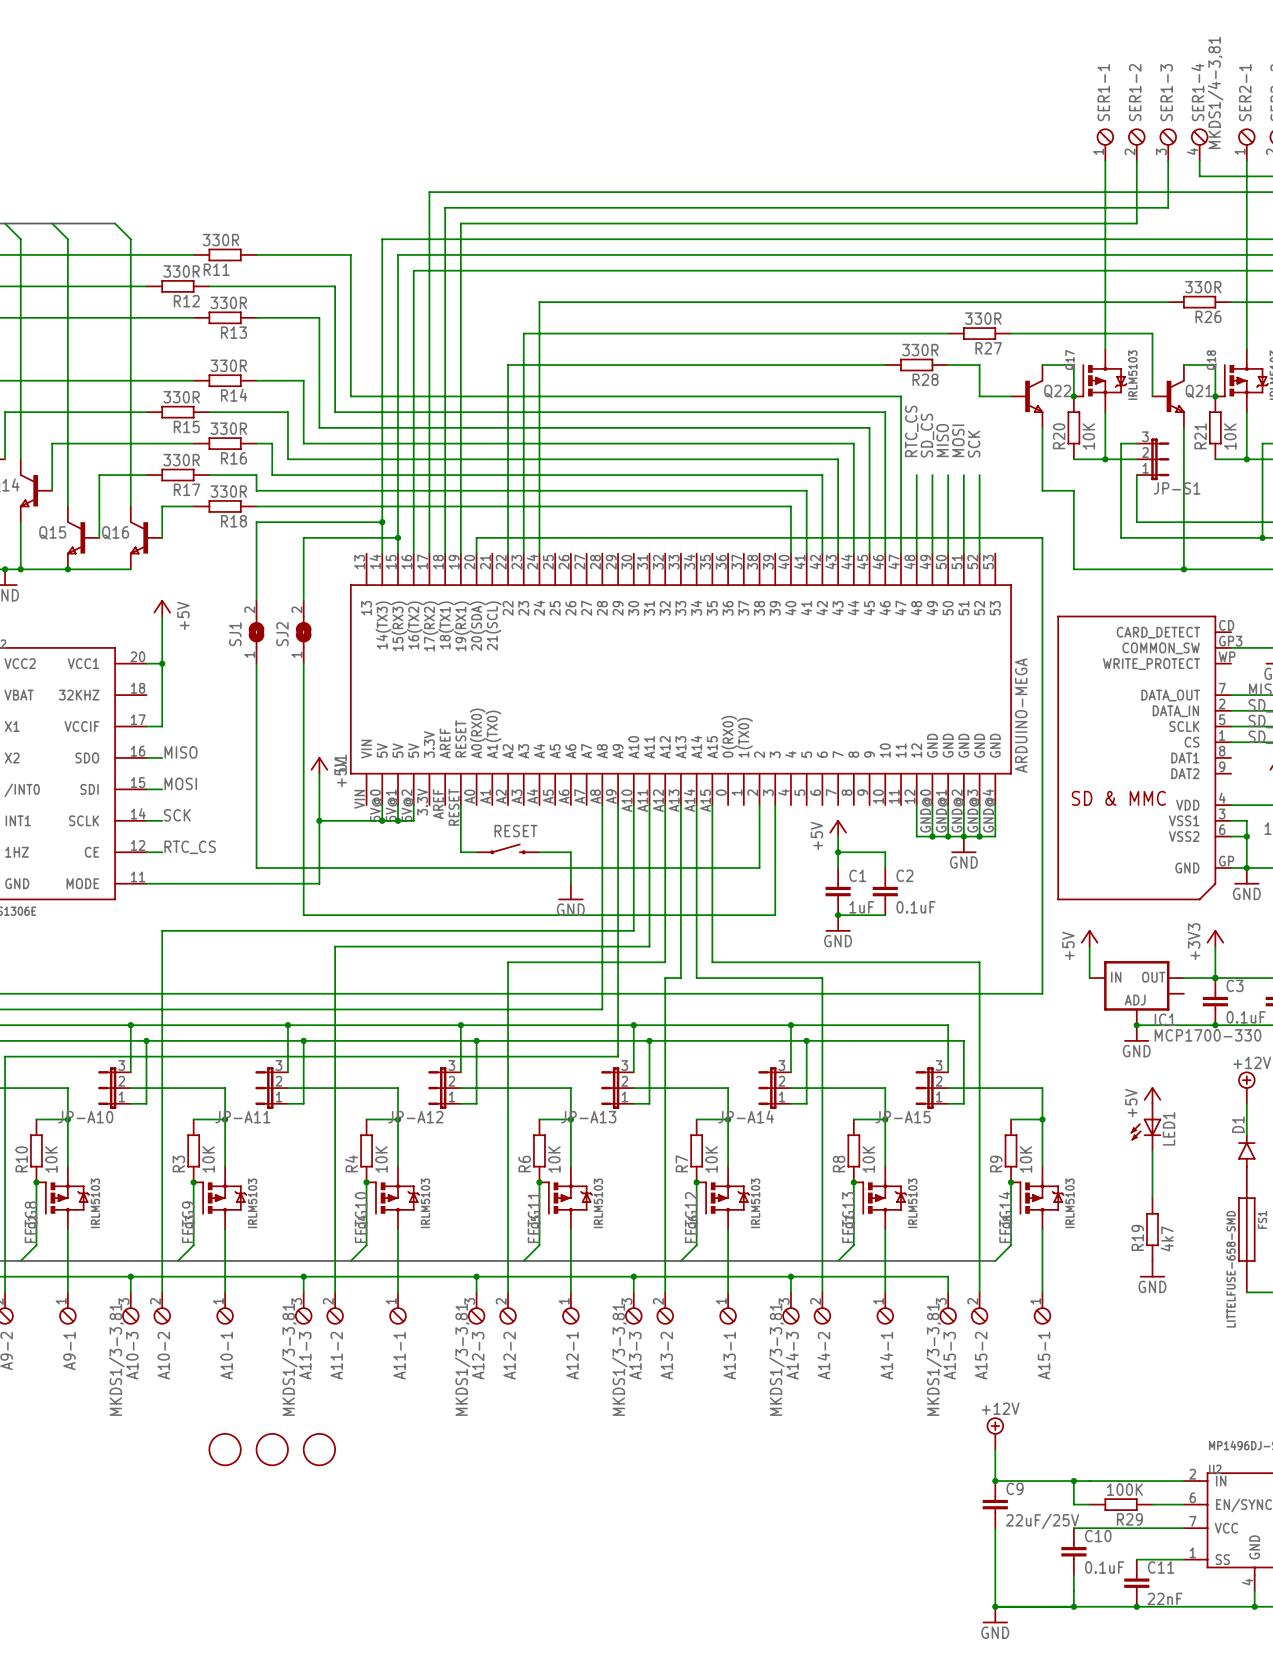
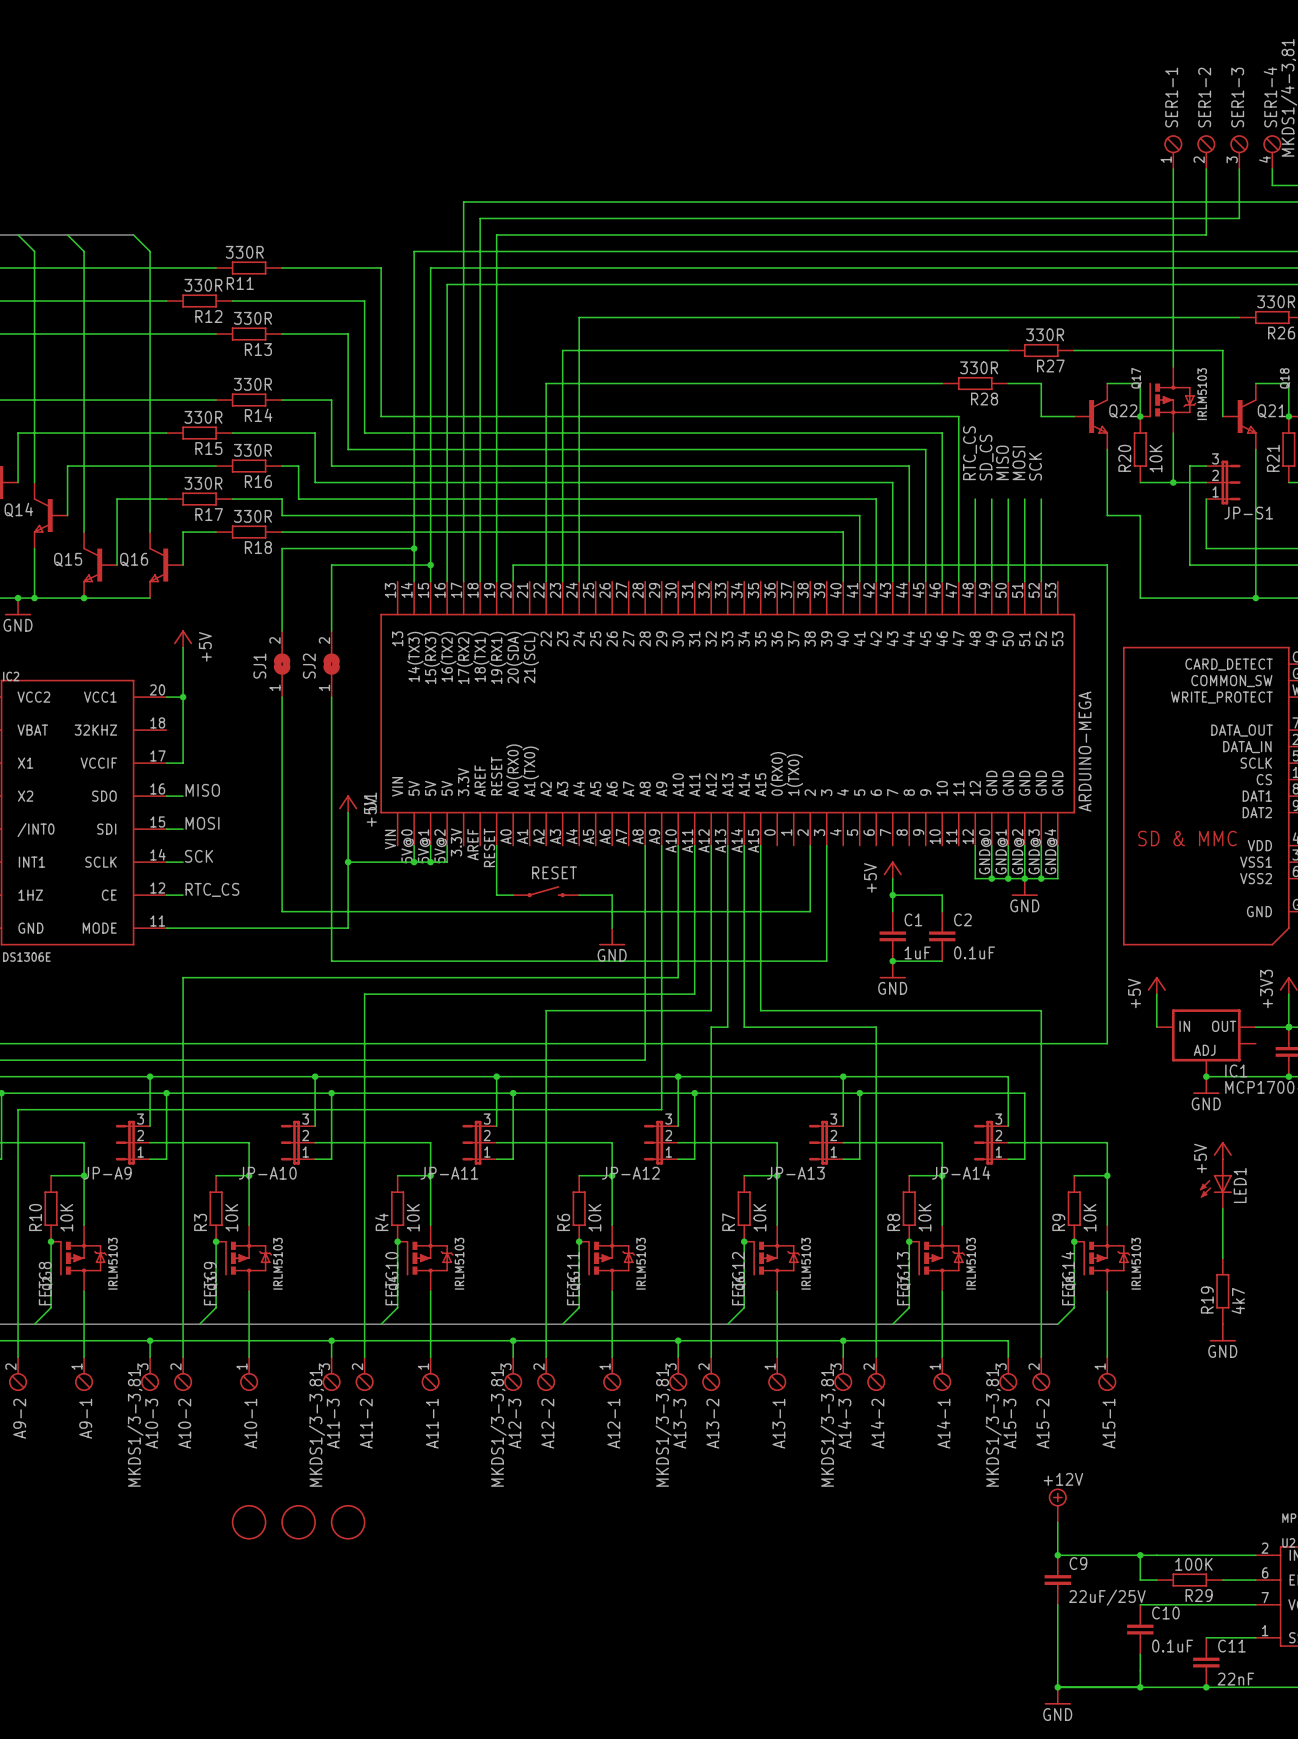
JP-A14 name: JP-A14 (746, 1116) -> JP-A13 (795, 1173)
JP-A10 name: JP-A10 (85, 1117) -> JP-A9 (107, 1173)
JP-A11 name: JP-A11 (242, 1117) -> JP-A10 (267, 1173)
JP-A12 name: JP-A12 (415, 1117) -> JP-A11 (449, 1173)
JP-A13 name: JP-A13 (588, 1117) -> JP-A12 (630, 1173)
JP-A15 name: JP-A15 (903, 1117) -> JP-A14 (961, 1172)

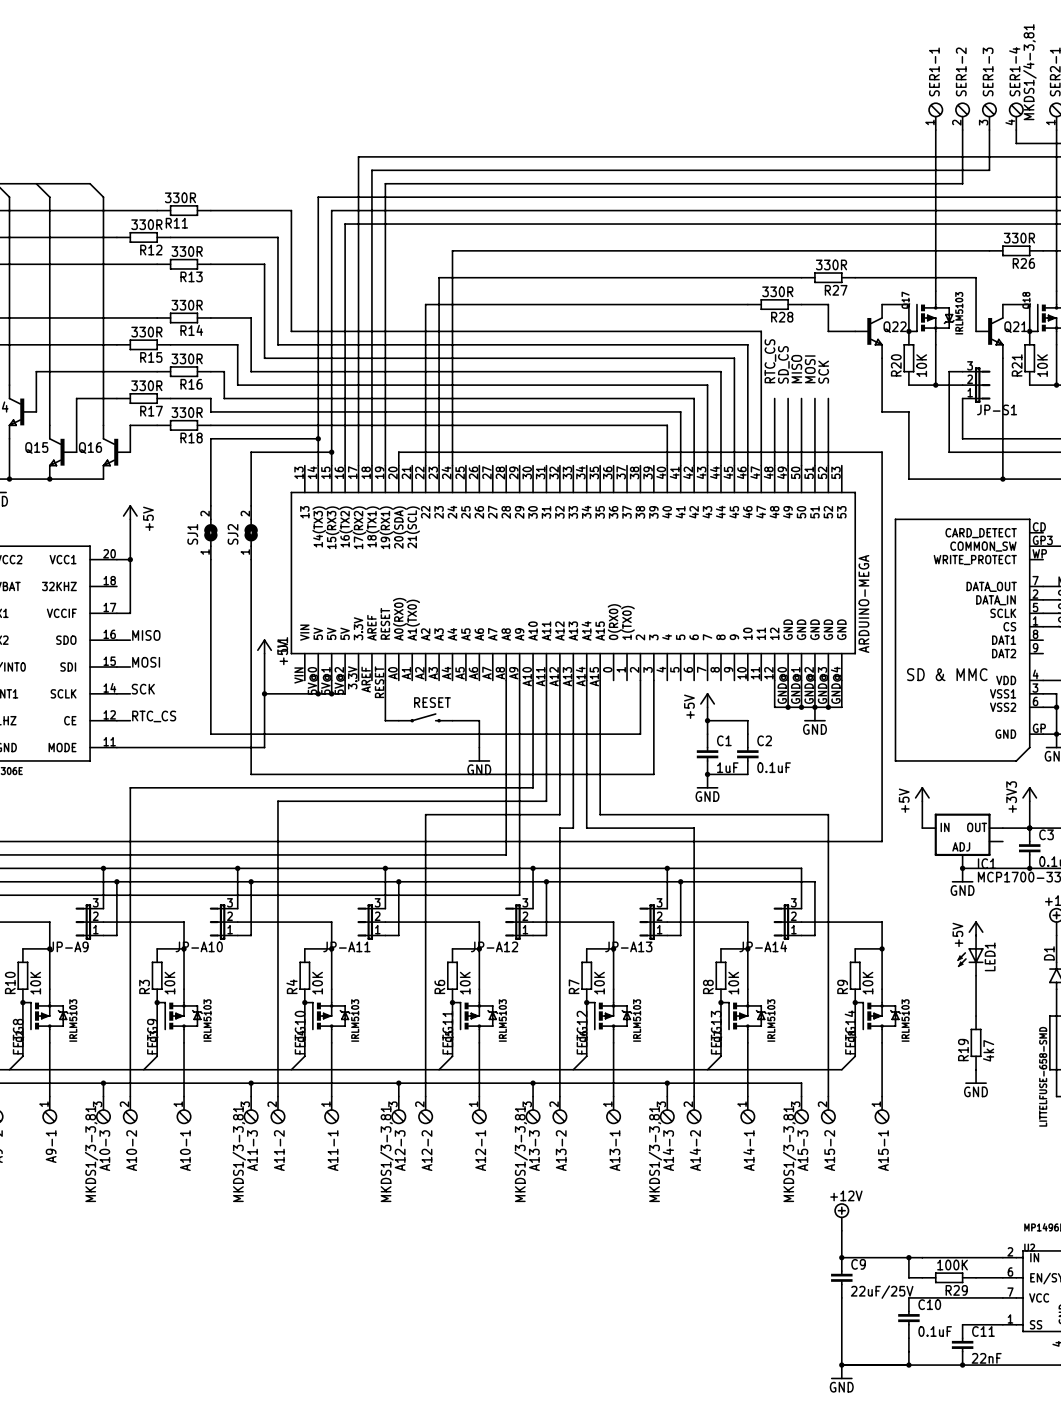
part: (249, 1522) -> none
part: (298, 1522) -> none
part: (348, 1522) -> none

